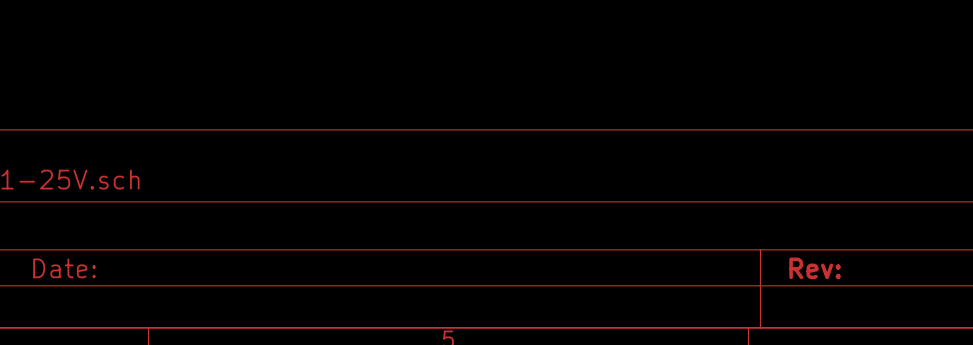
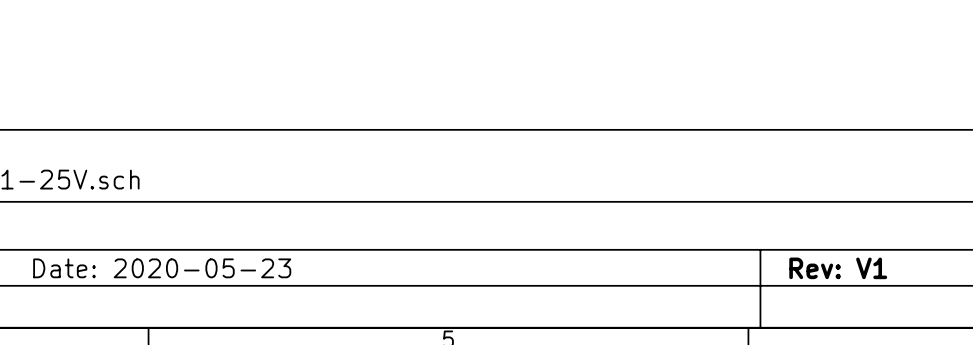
title block: Date: (64, 268) -> Date: 2020-05-23 (162, 268)
title block: Rev: (815, 268) -> Rev: V1 (838, 268)

